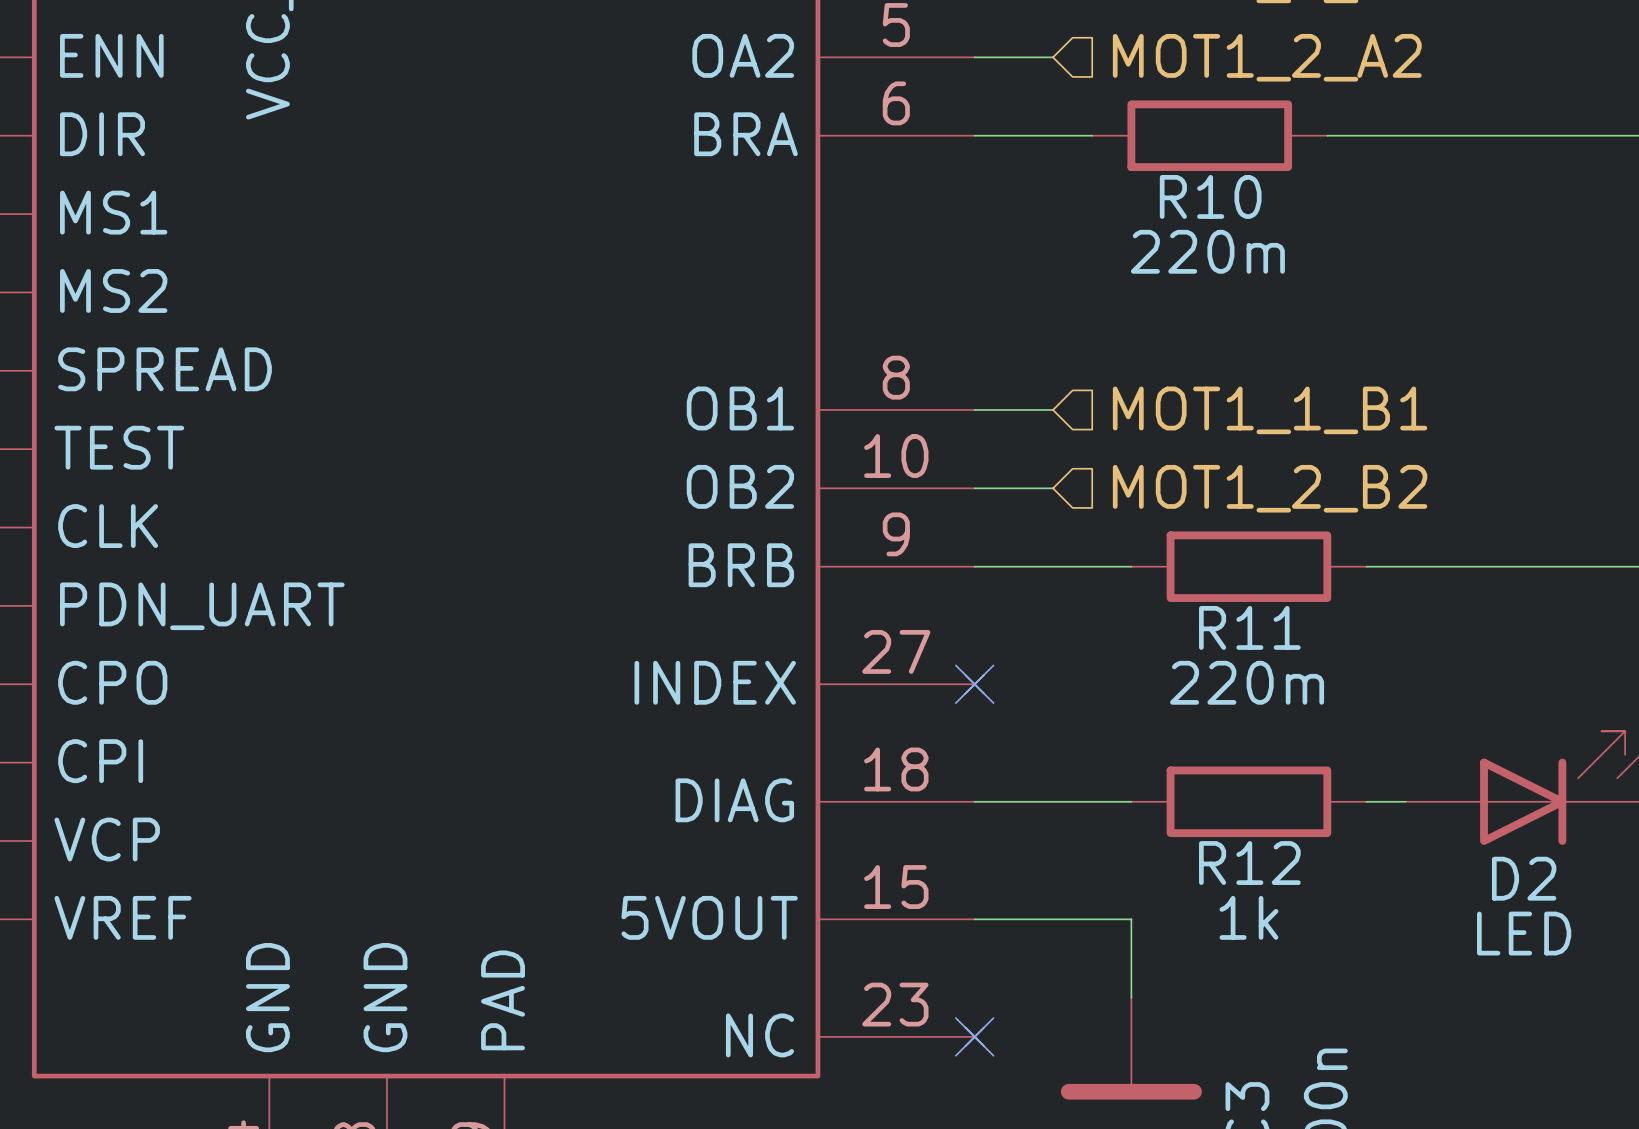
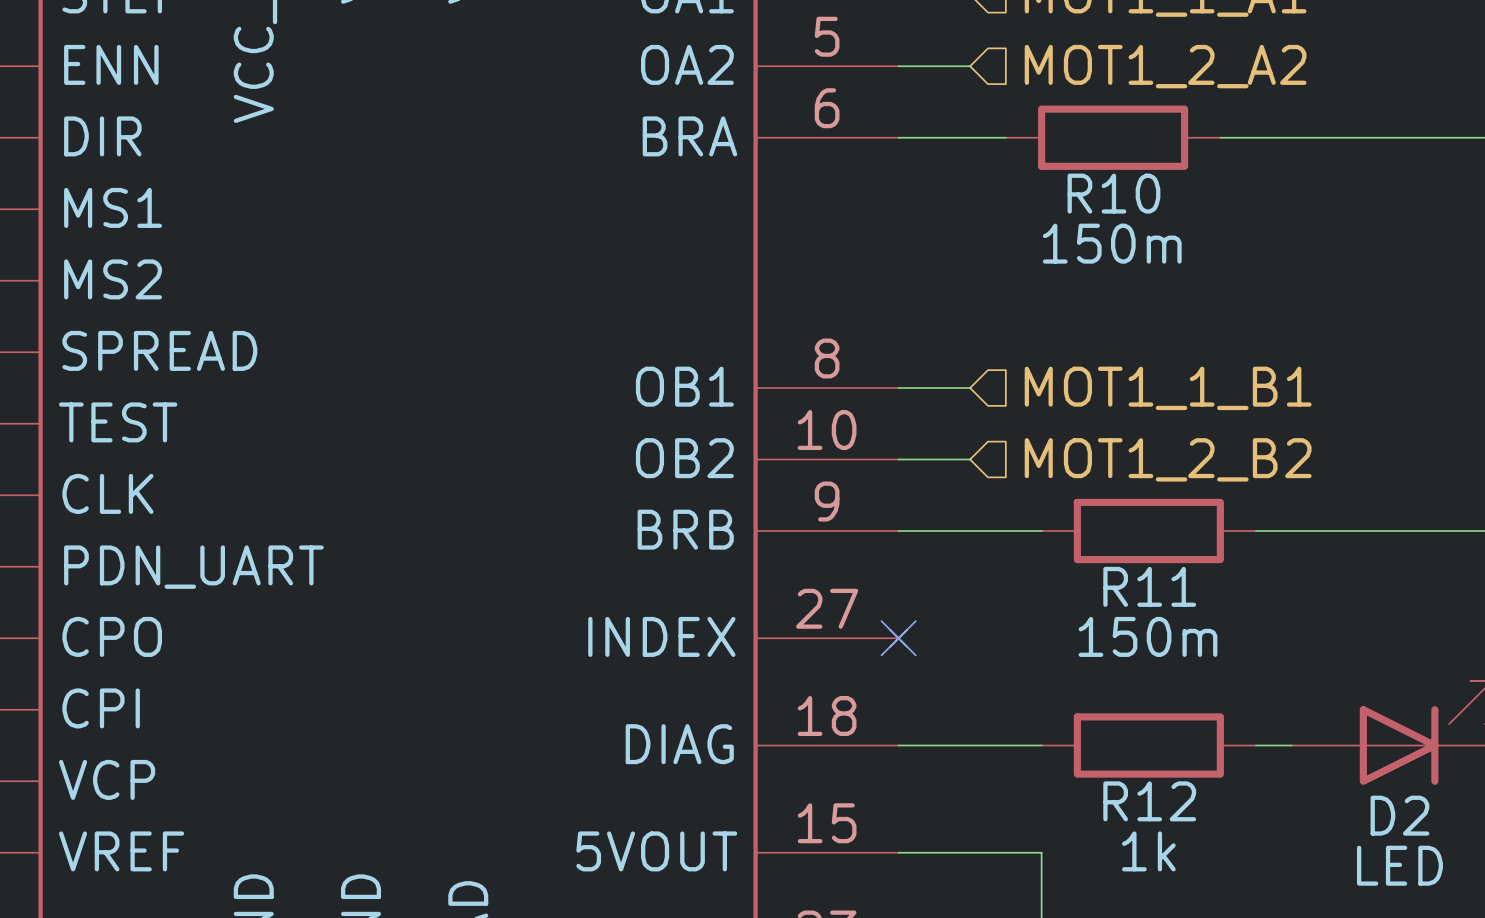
R10 value: 220m (1207, 251) -> 150m (1112, 243)
R11 value: 220m (1247, 682) -> 150m (1148, 636)

